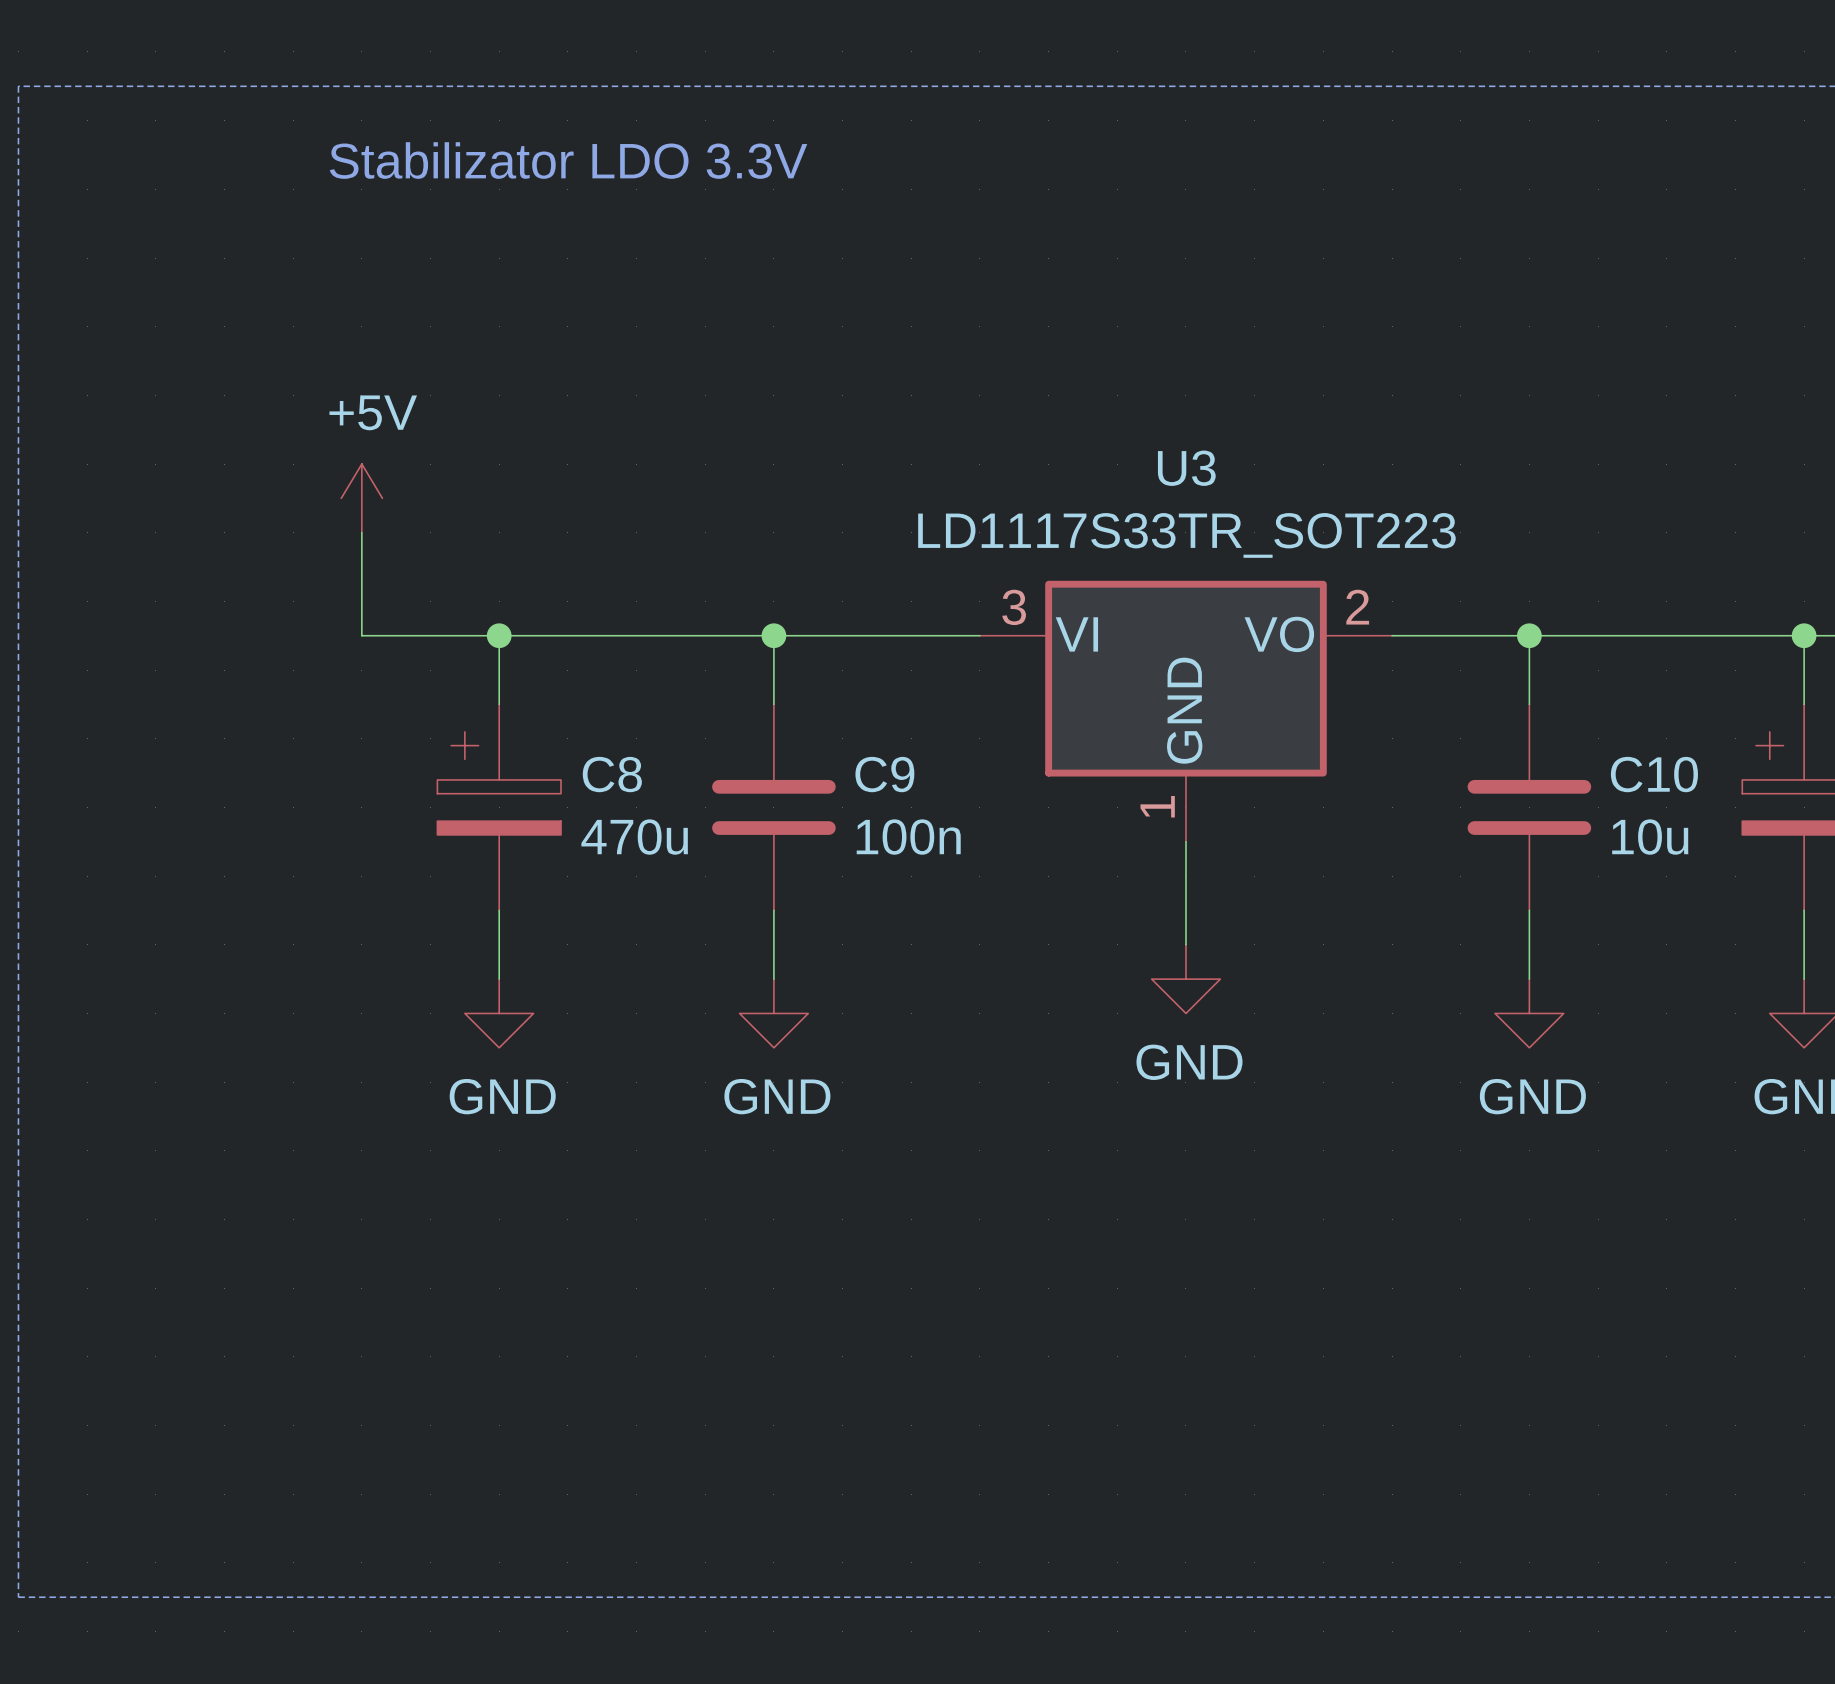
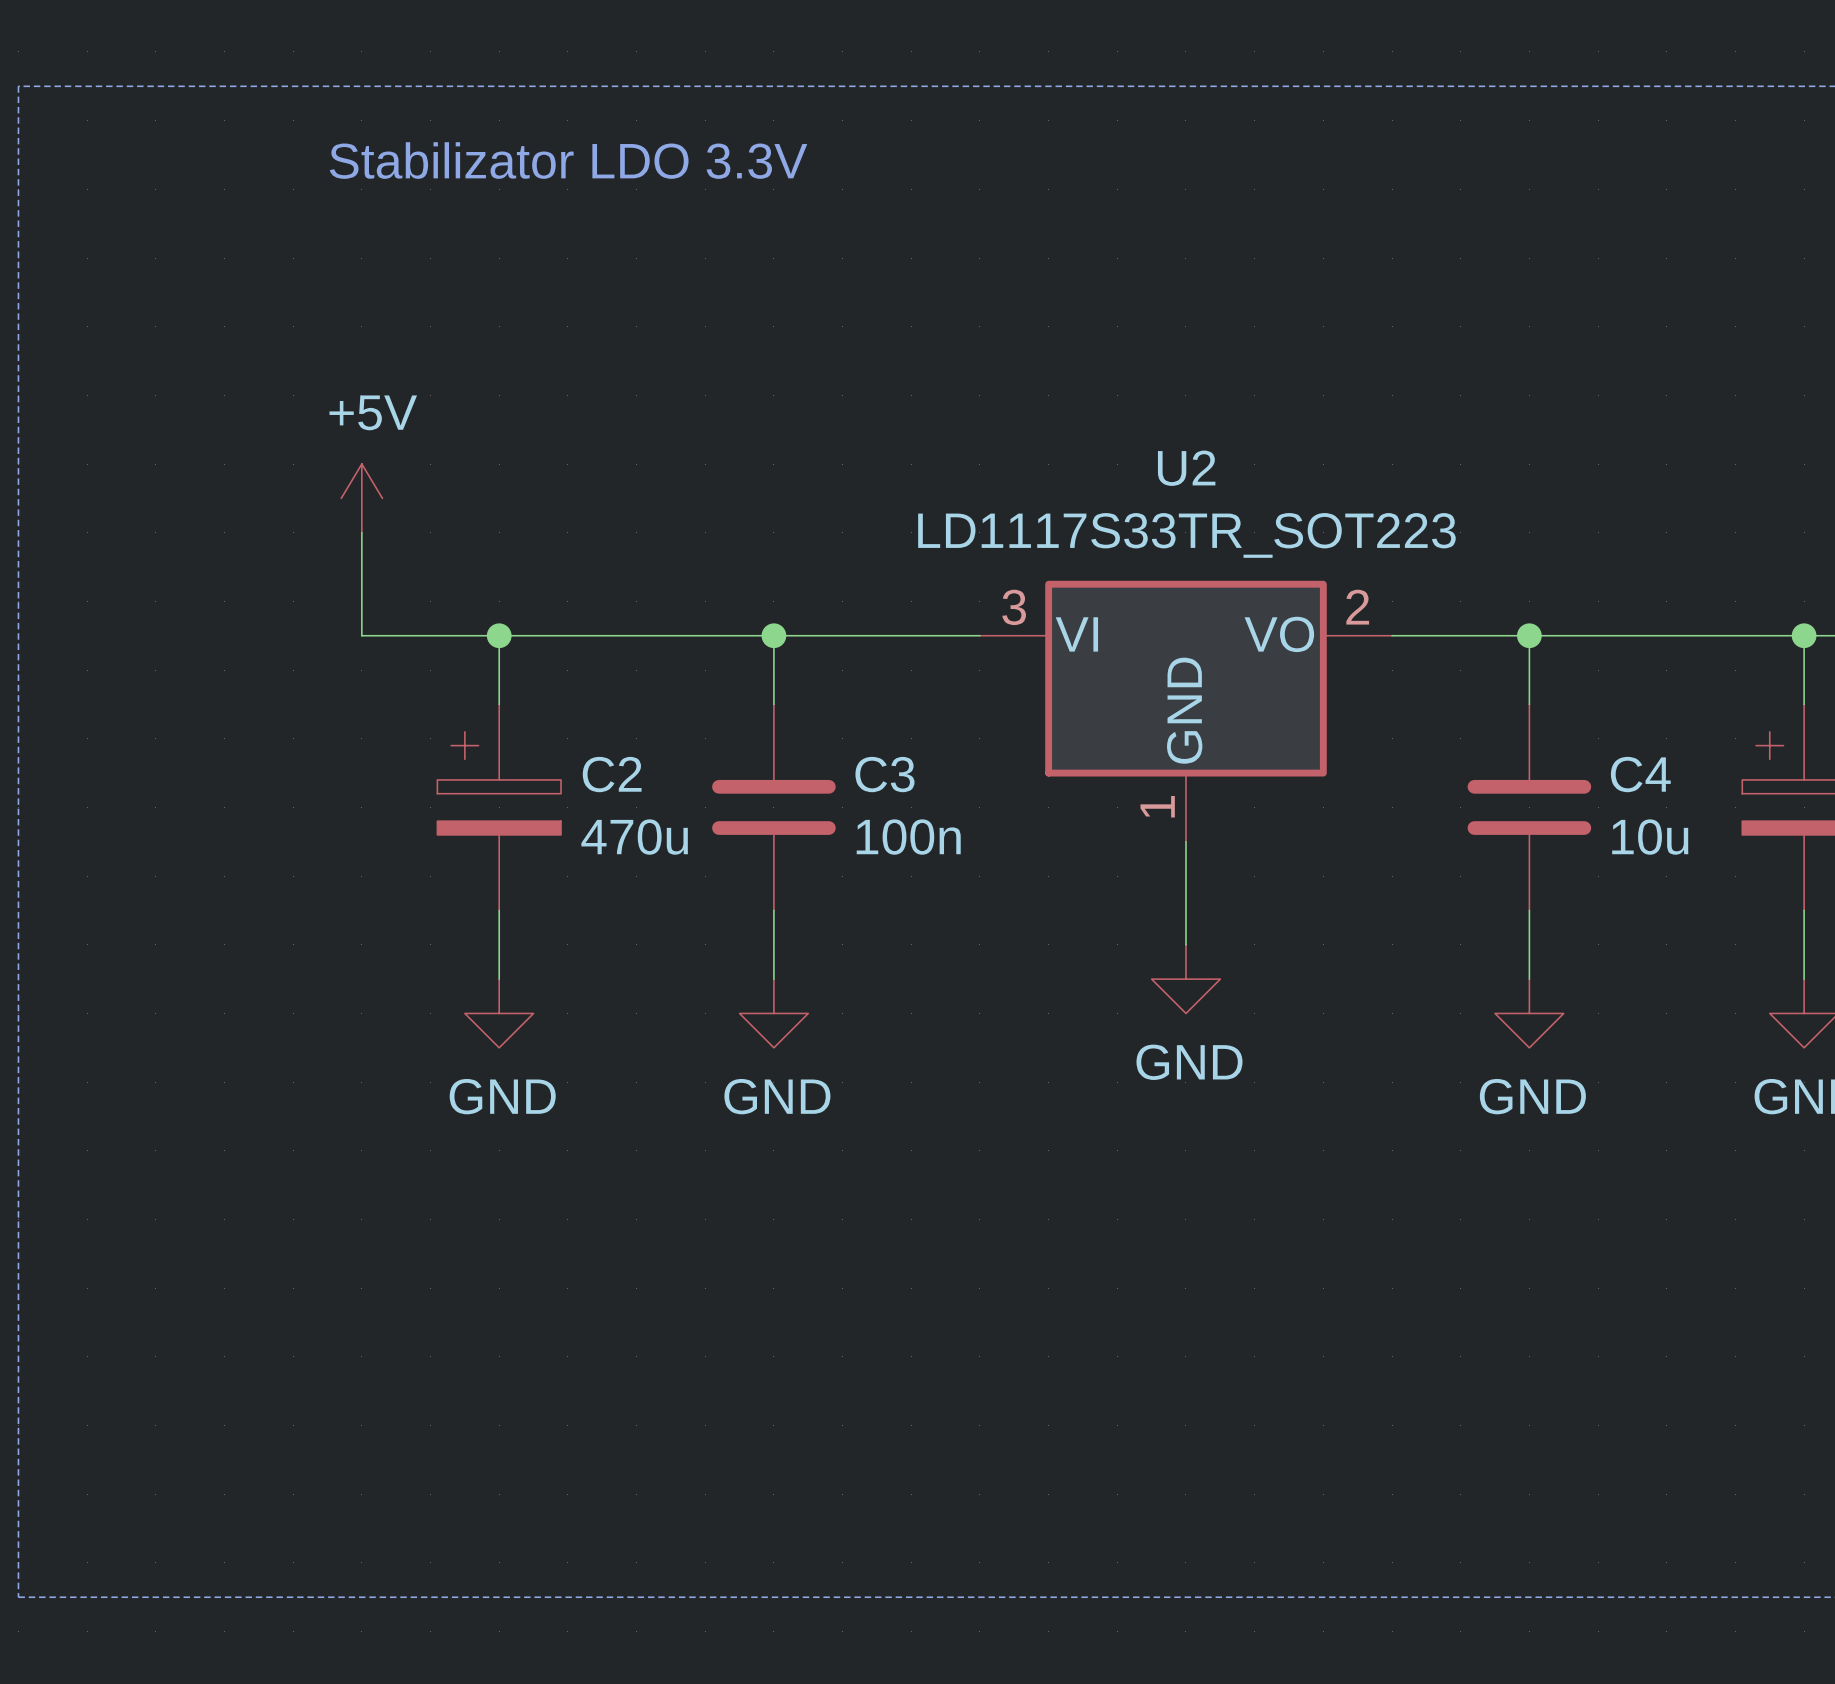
U3 name: U3 (1186, 468) -> U2 (1186, 468)
C8 name: C8 (612, 774) -> C2 (612, 774)
C9 name: C9 (884, 774) -> C3 (884, 774)
C10 name: C10 (1654, 774) -> C4 (1640, 774)

